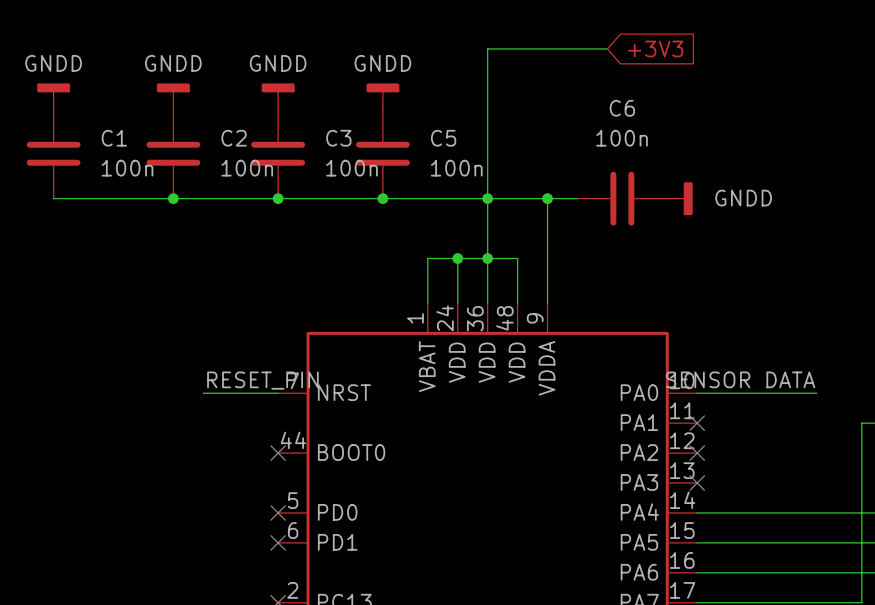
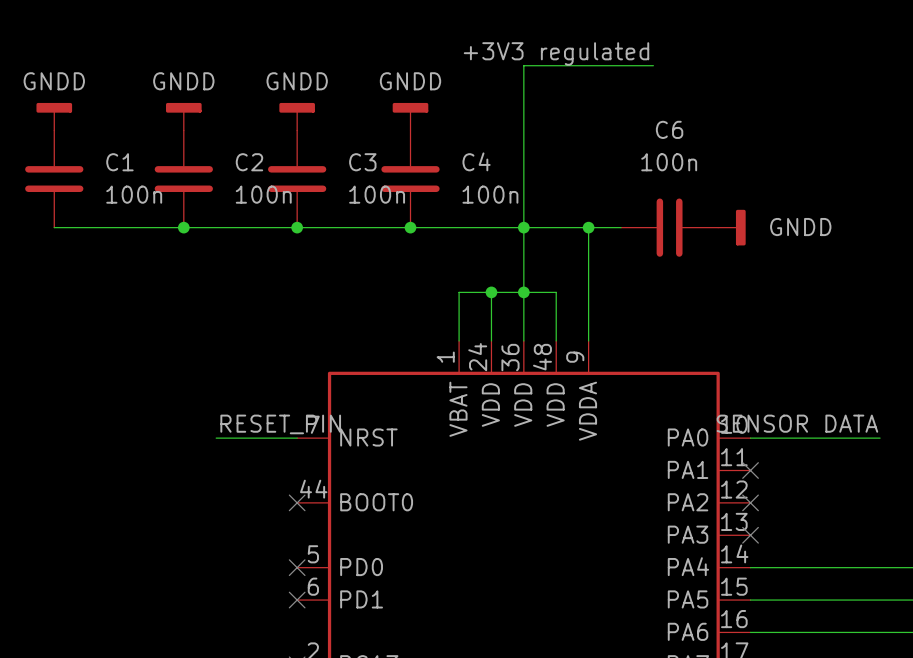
label: none -> +3V3 regulated (556, 53)
global label: +3V3 (655, 48) -> none
C5 name: C5 (443, 138) -> C4 (476, 161)

